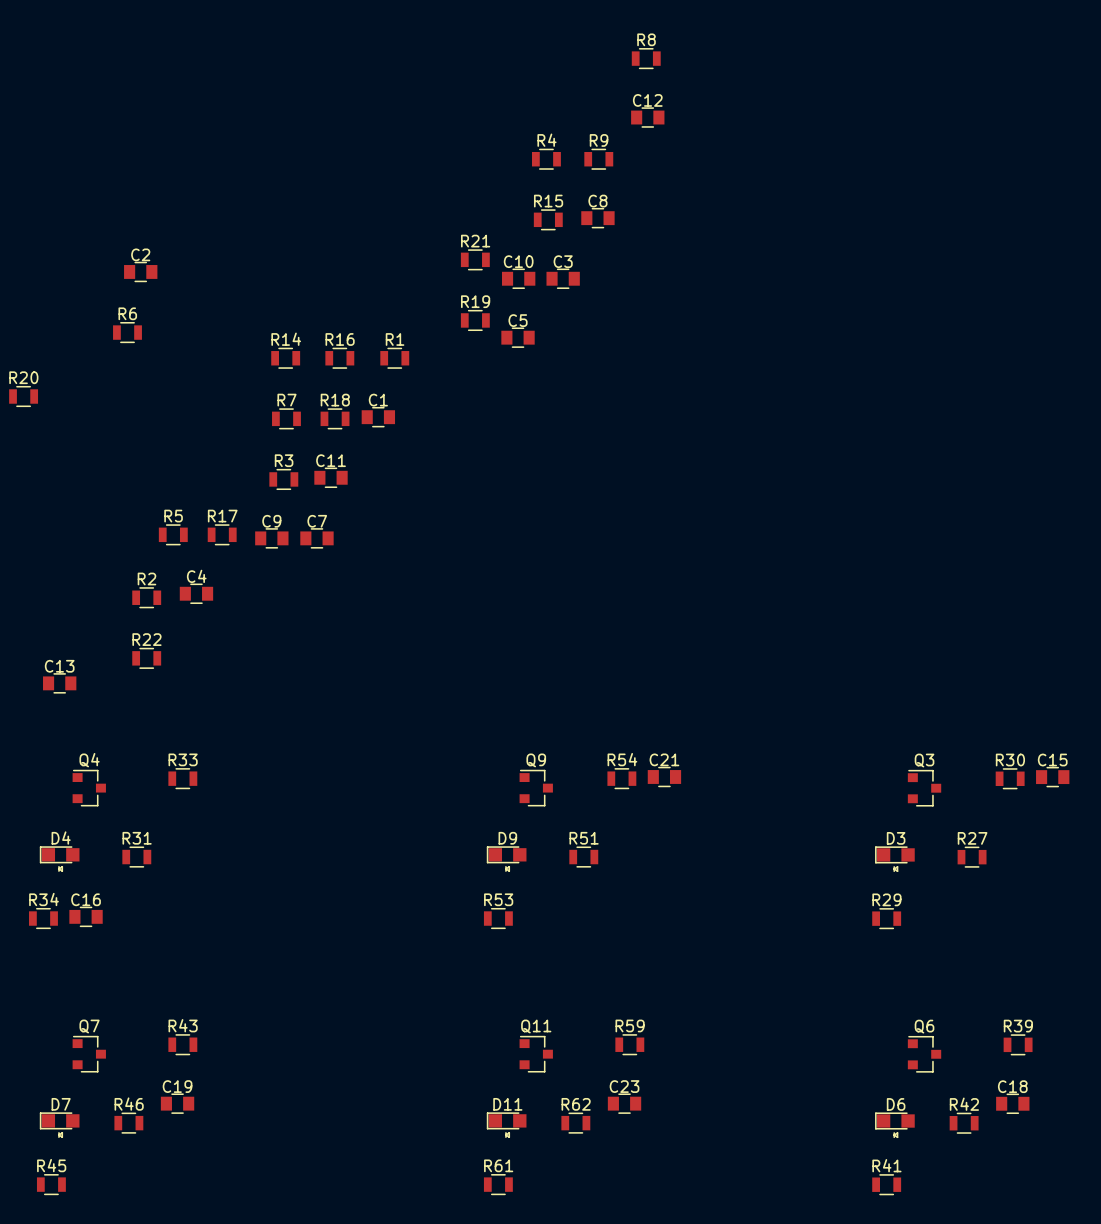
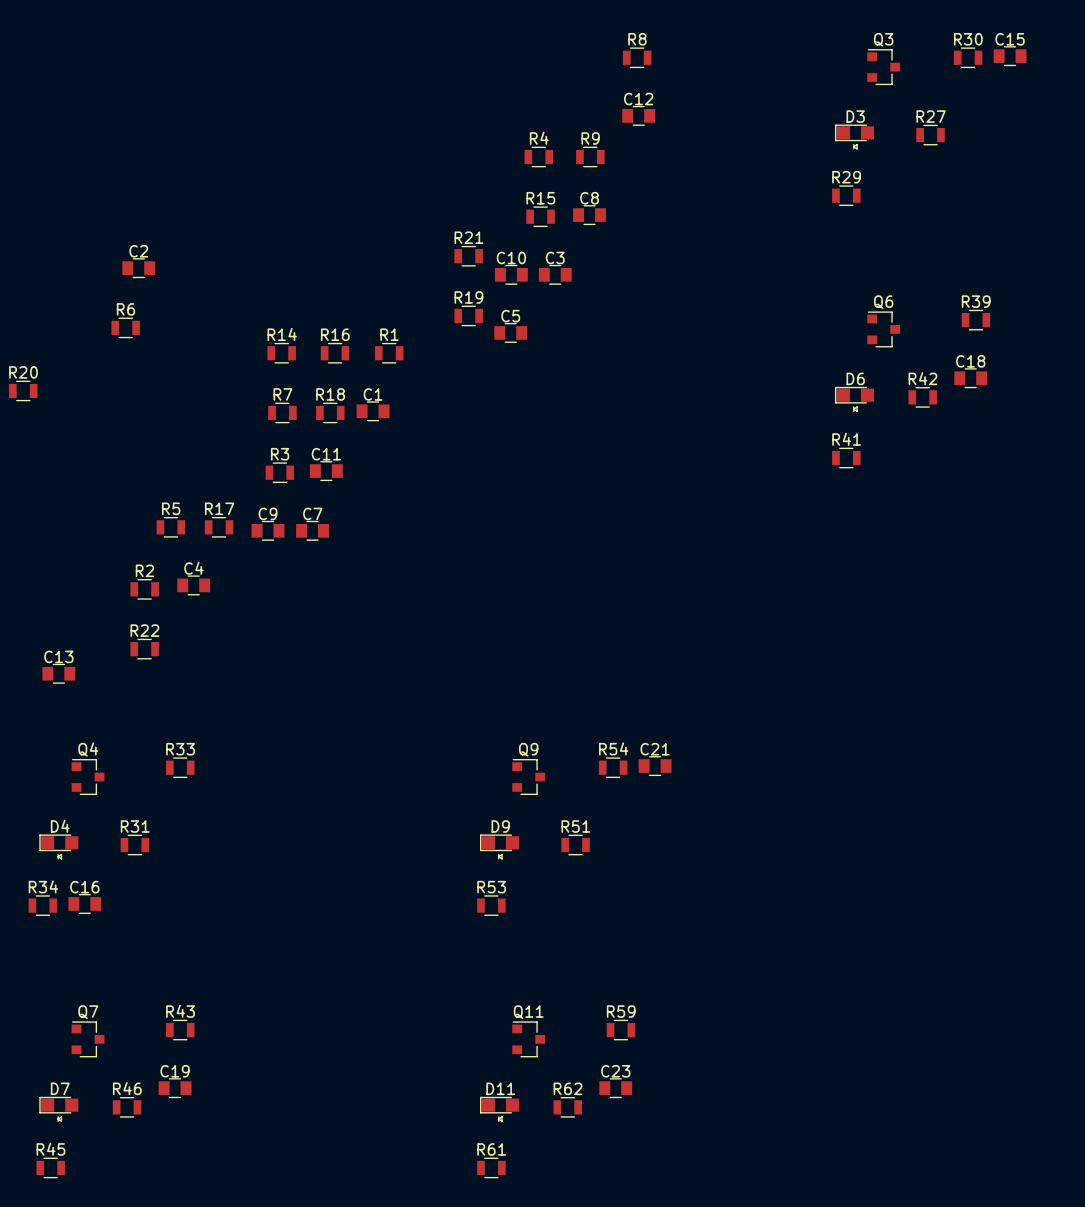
C15 position: (1052, 777) -> (1010, 56)
R30 position: (1010, 778) -> (968, 57)
Q3 position: (924, 788) -> (883, 67)
R27 position: (972, 857) -> (930, 135)
D3 position: (894, 859) -> (854, 137)
R29 position: (886, 918) -> (846, 195)
R39 position: (1018, 1044) -> (975, 320)
Q6 position: (924, 1054) -> (883, 329)
C18 position: (1012, 1103) -> (970, 378)
R42 position: (964, 1123) -> (922, 397)
D6 position: (894, 1125) -> (854, 399)
R41 position: (886, 1184) -> (846, 458)

